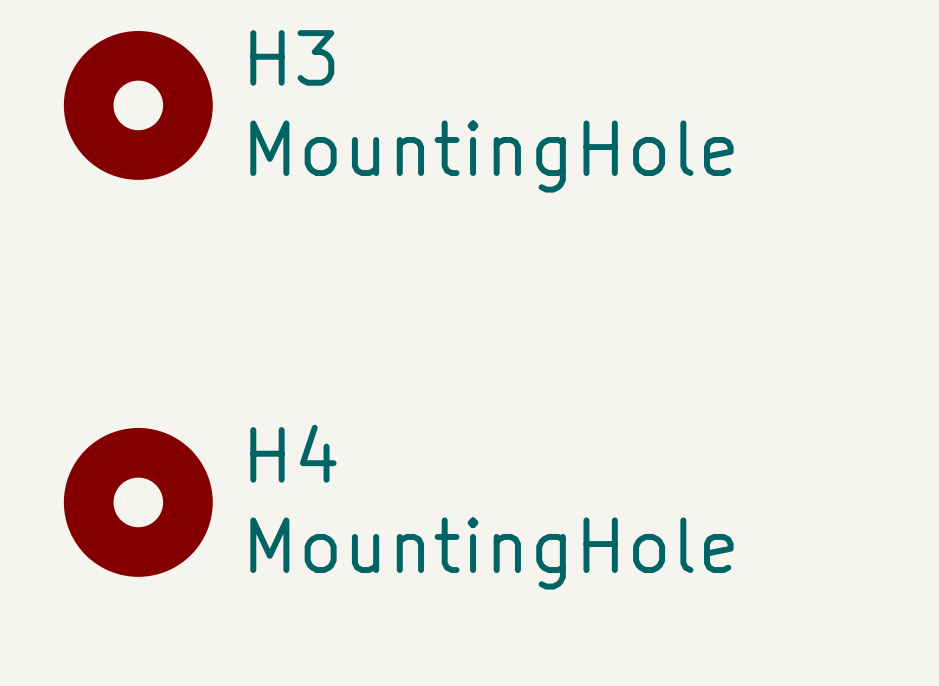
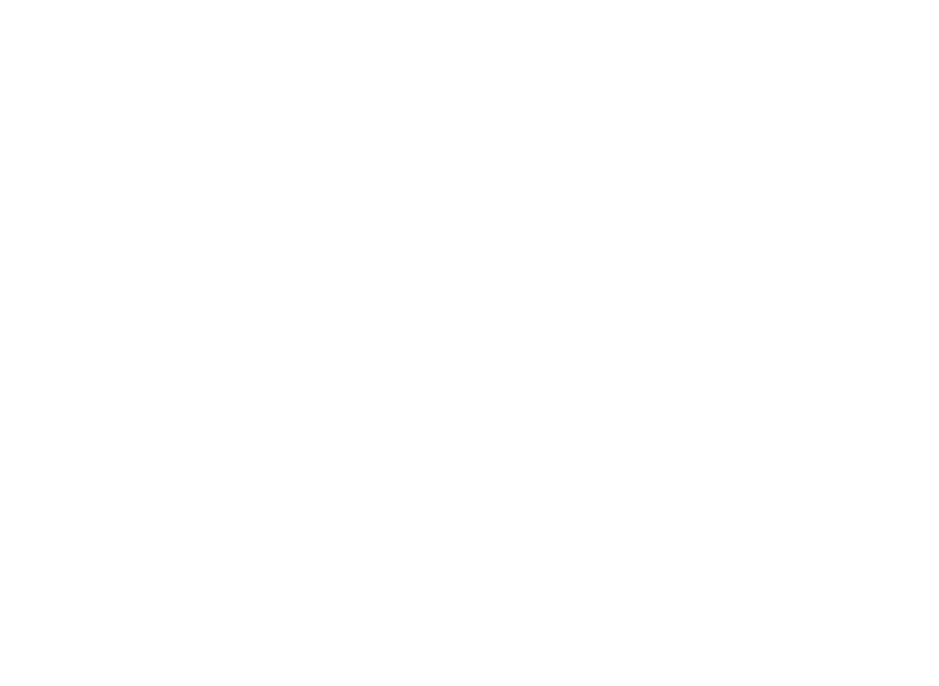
H3: MountingHole (138, 105) -> none
H4: MountingHole (138, 502) -> none

